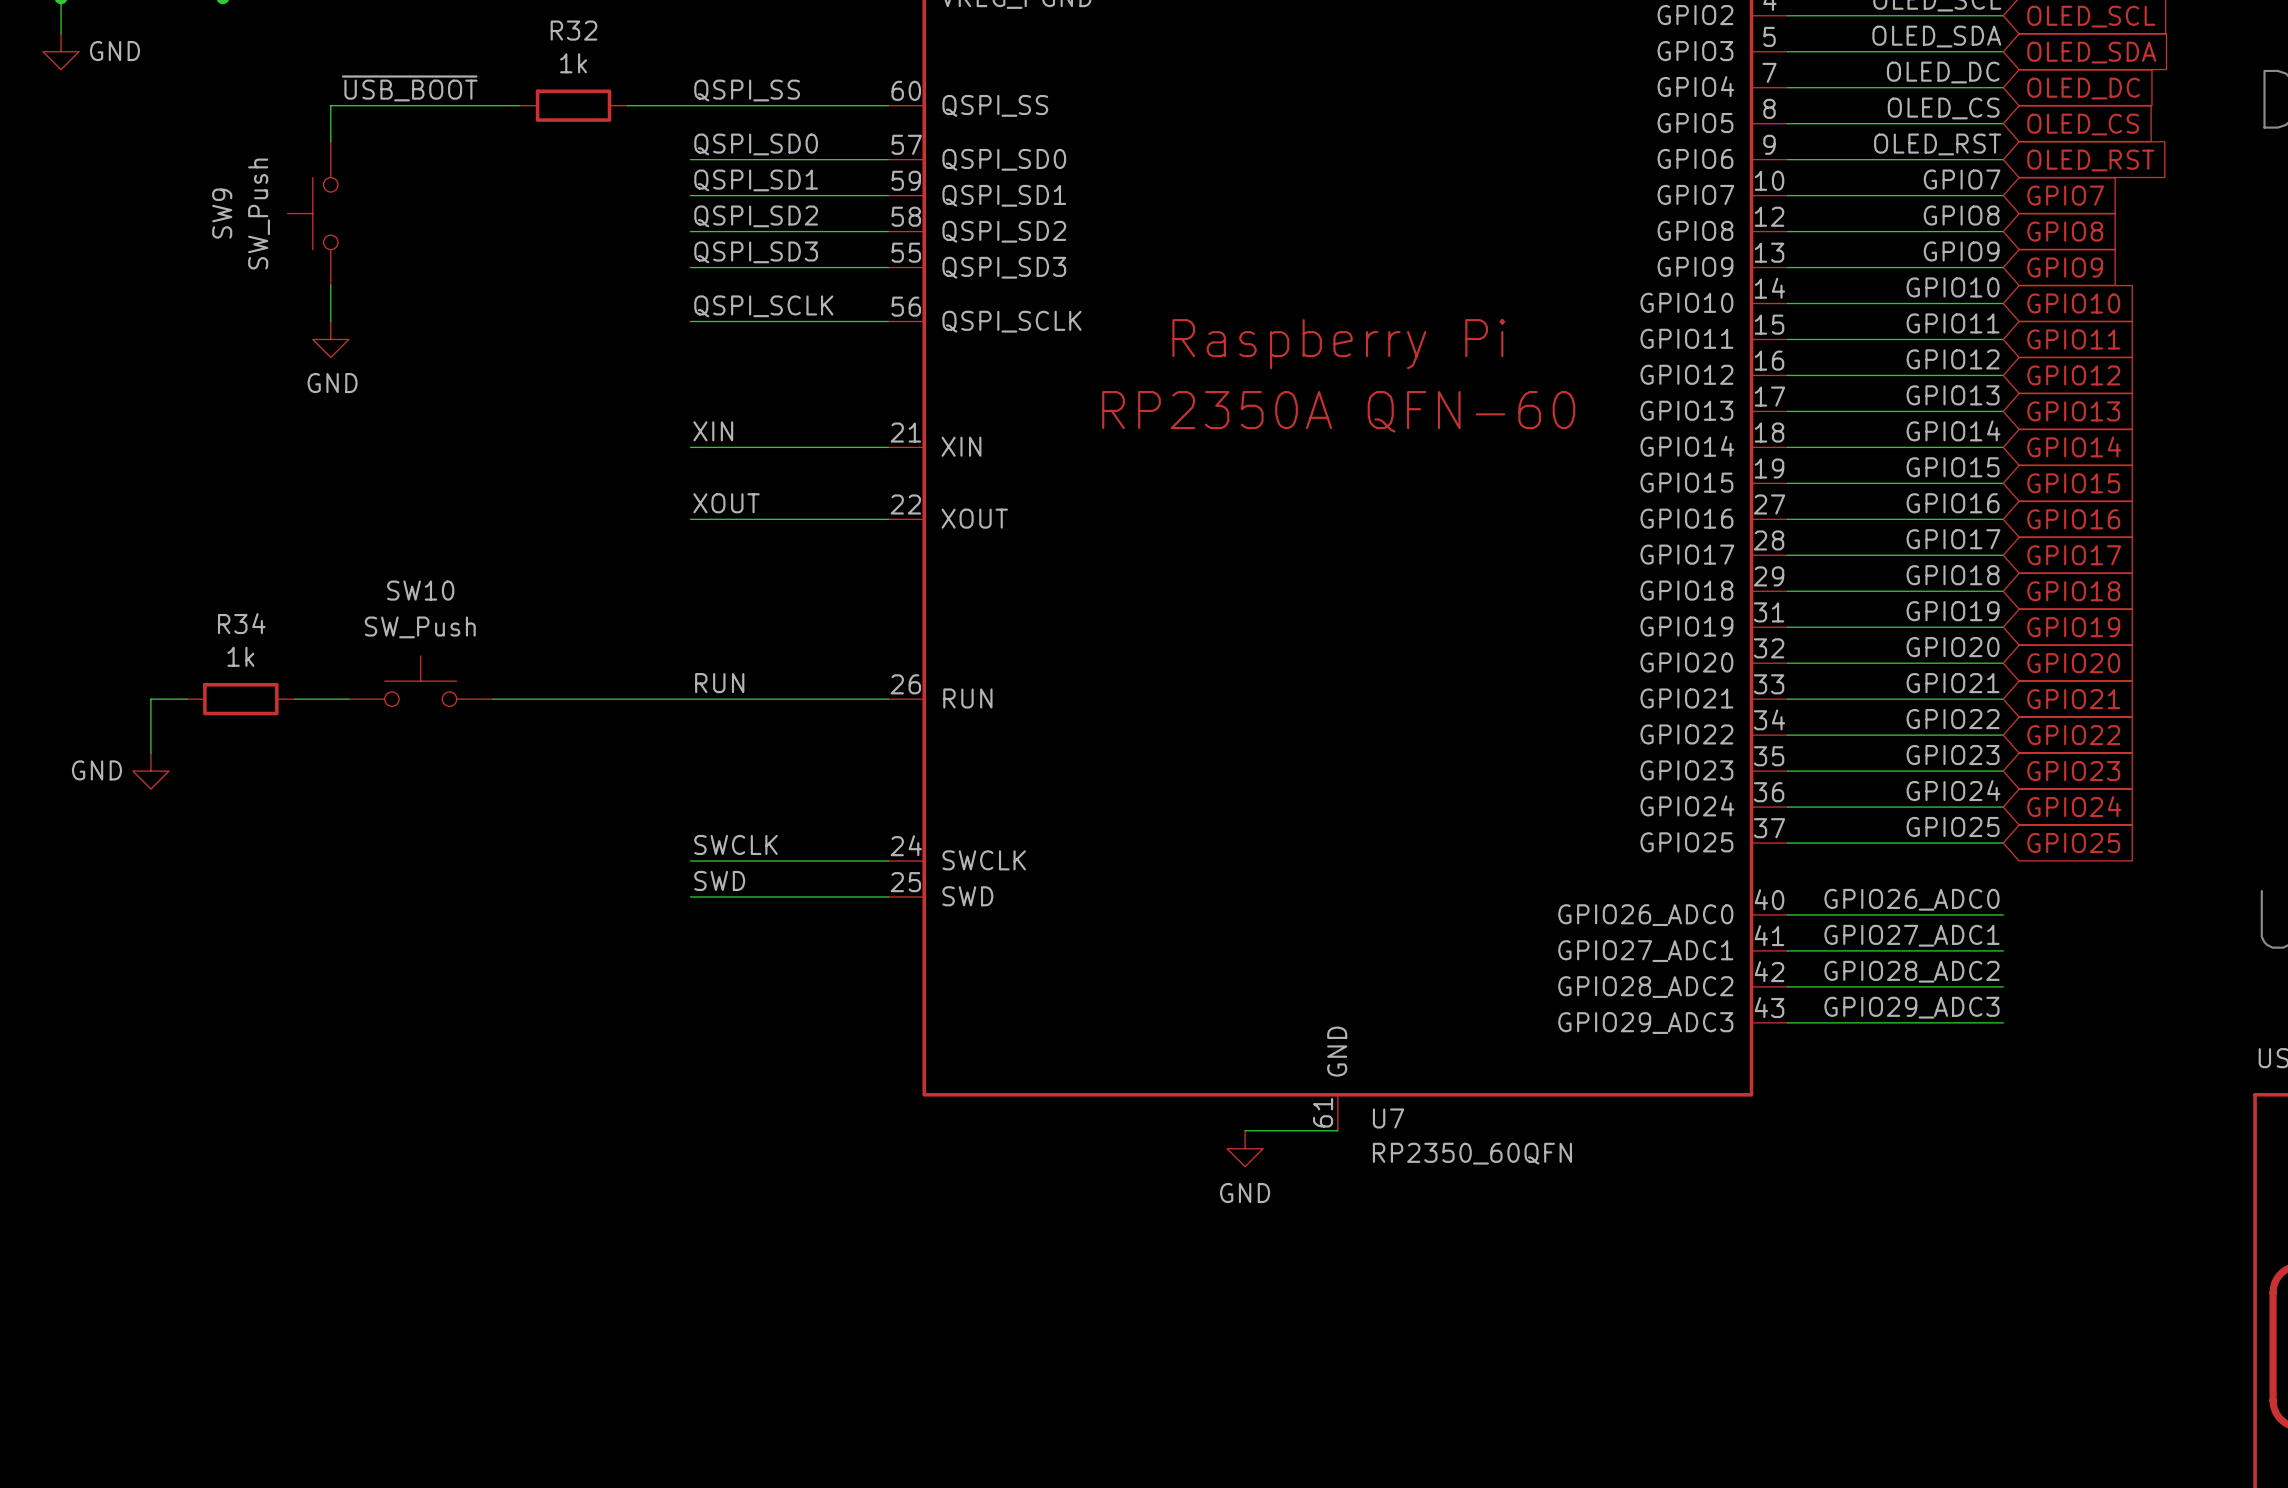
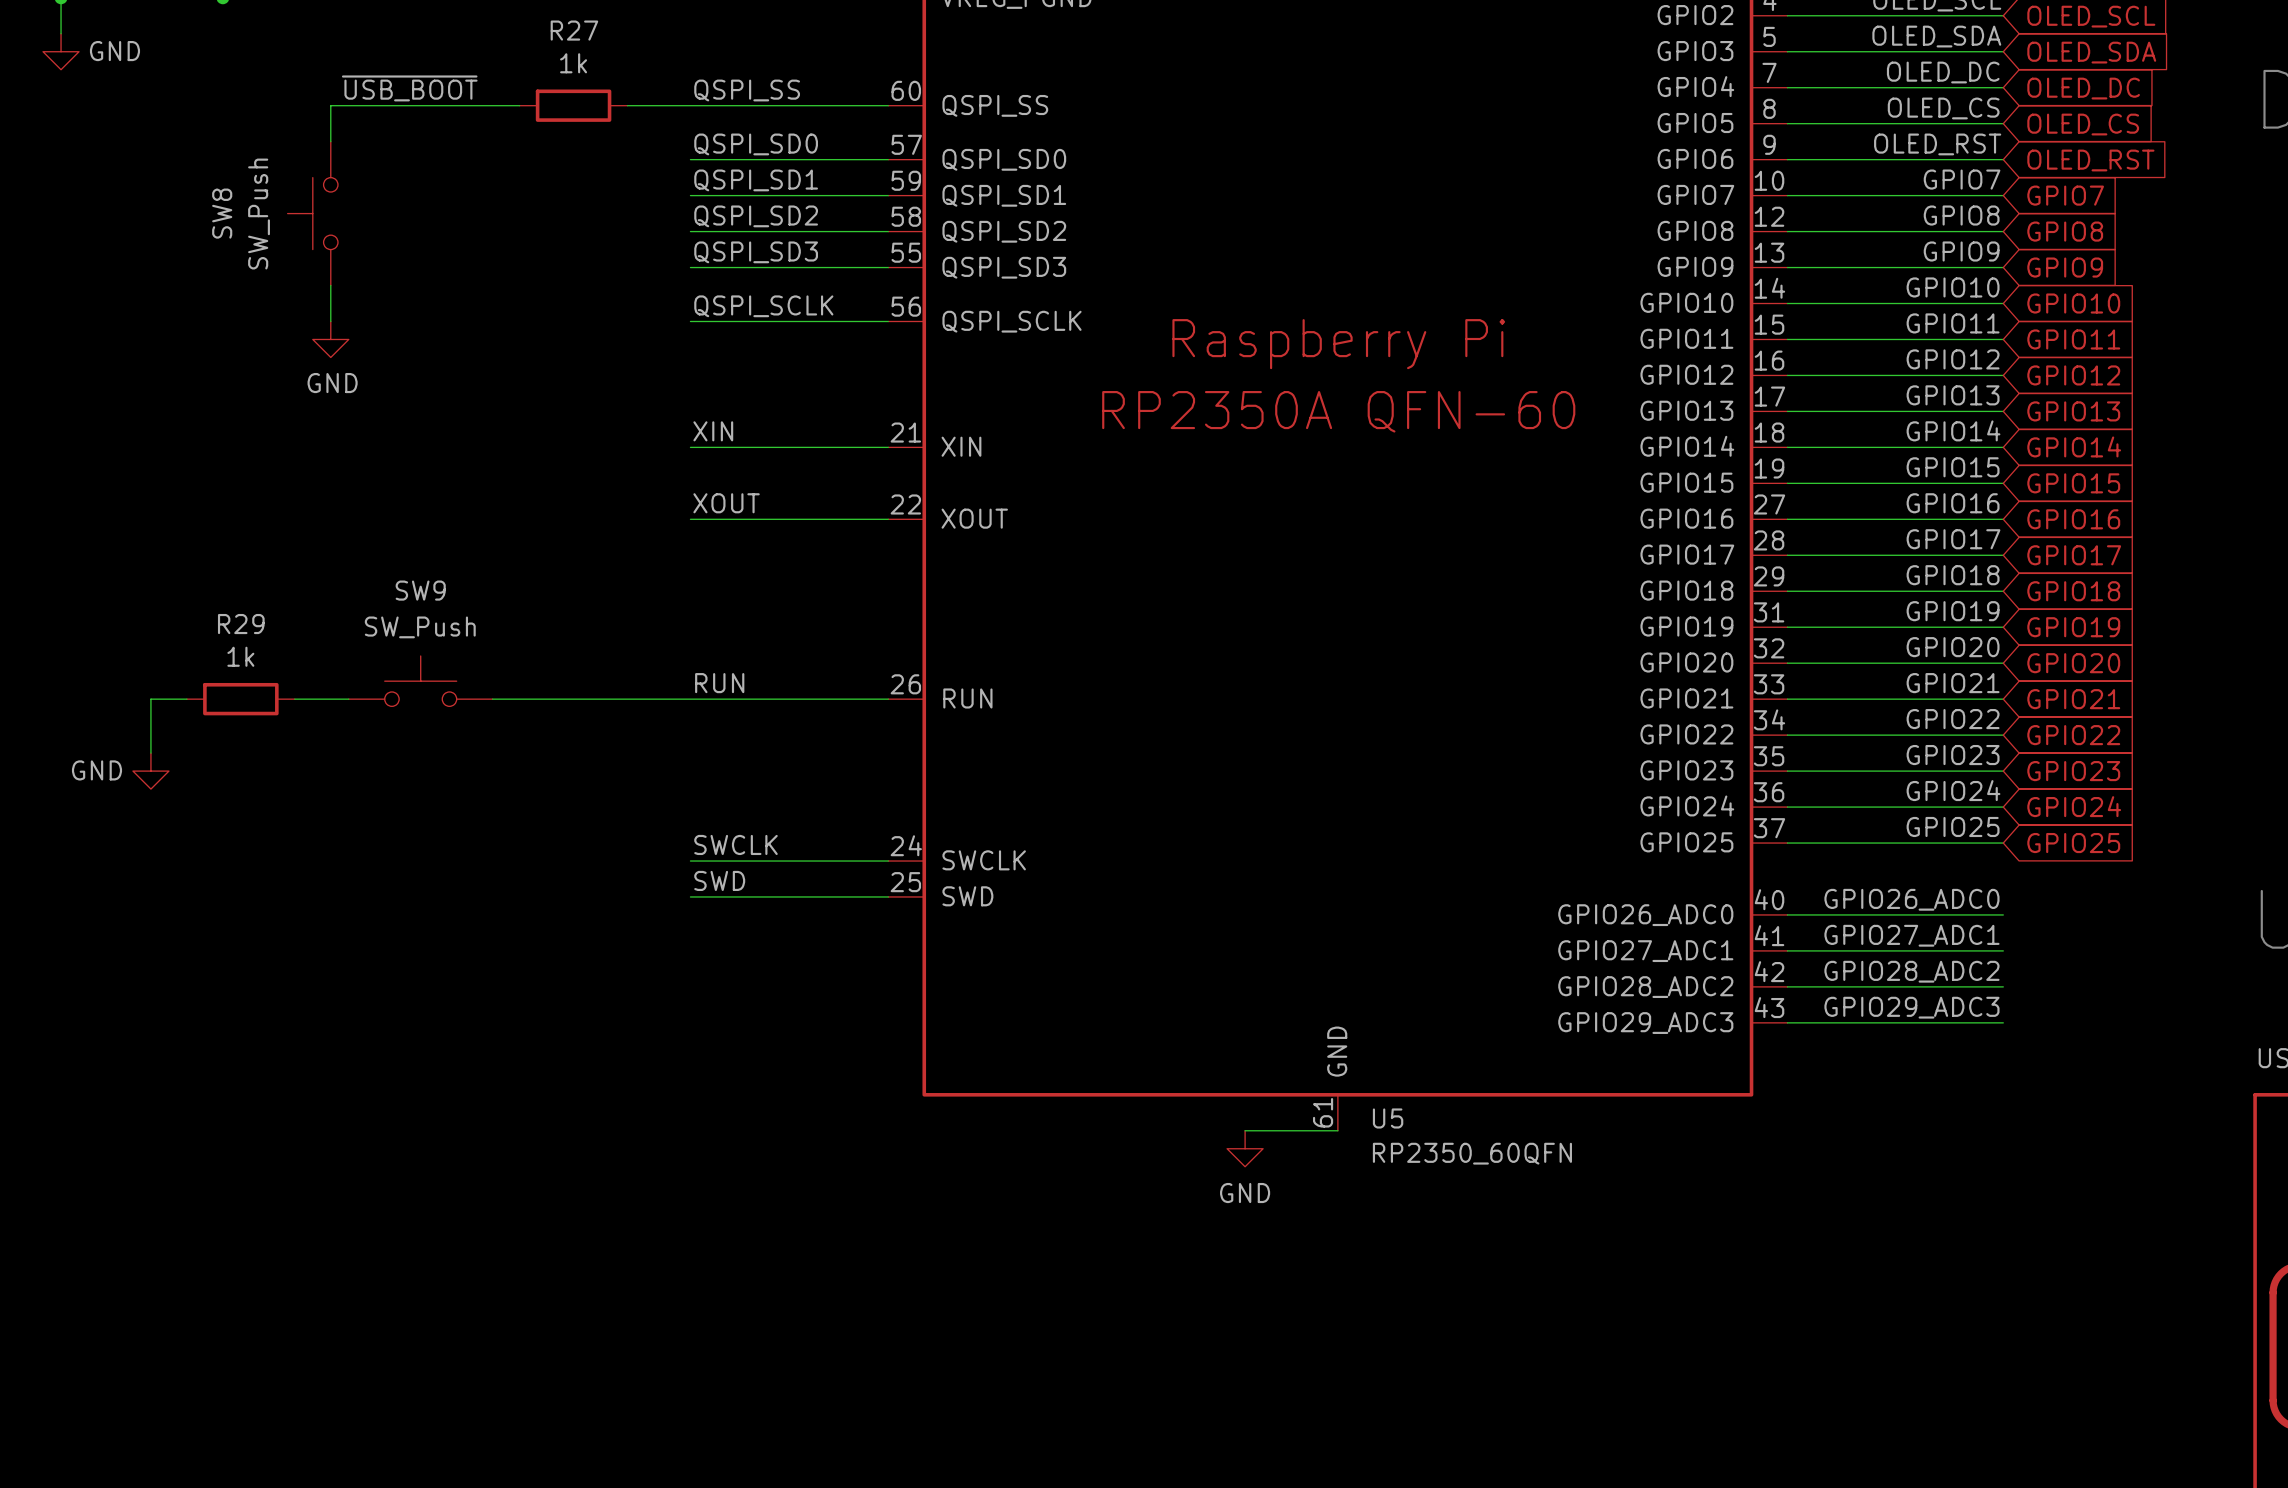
R32 name: R32 (574, 30) -> R27 (574, 30)
SW9 name: SW9 (222, 213) -> SW8 (222, 213)
SW10 name: SW10 (420, 590) -> SW9 (420, 590)
R34 name: R34 (241, 623) -> R29 (241, 624)
U7 name: U7 (1388, 1118) -> U5 (1388, 1118)

